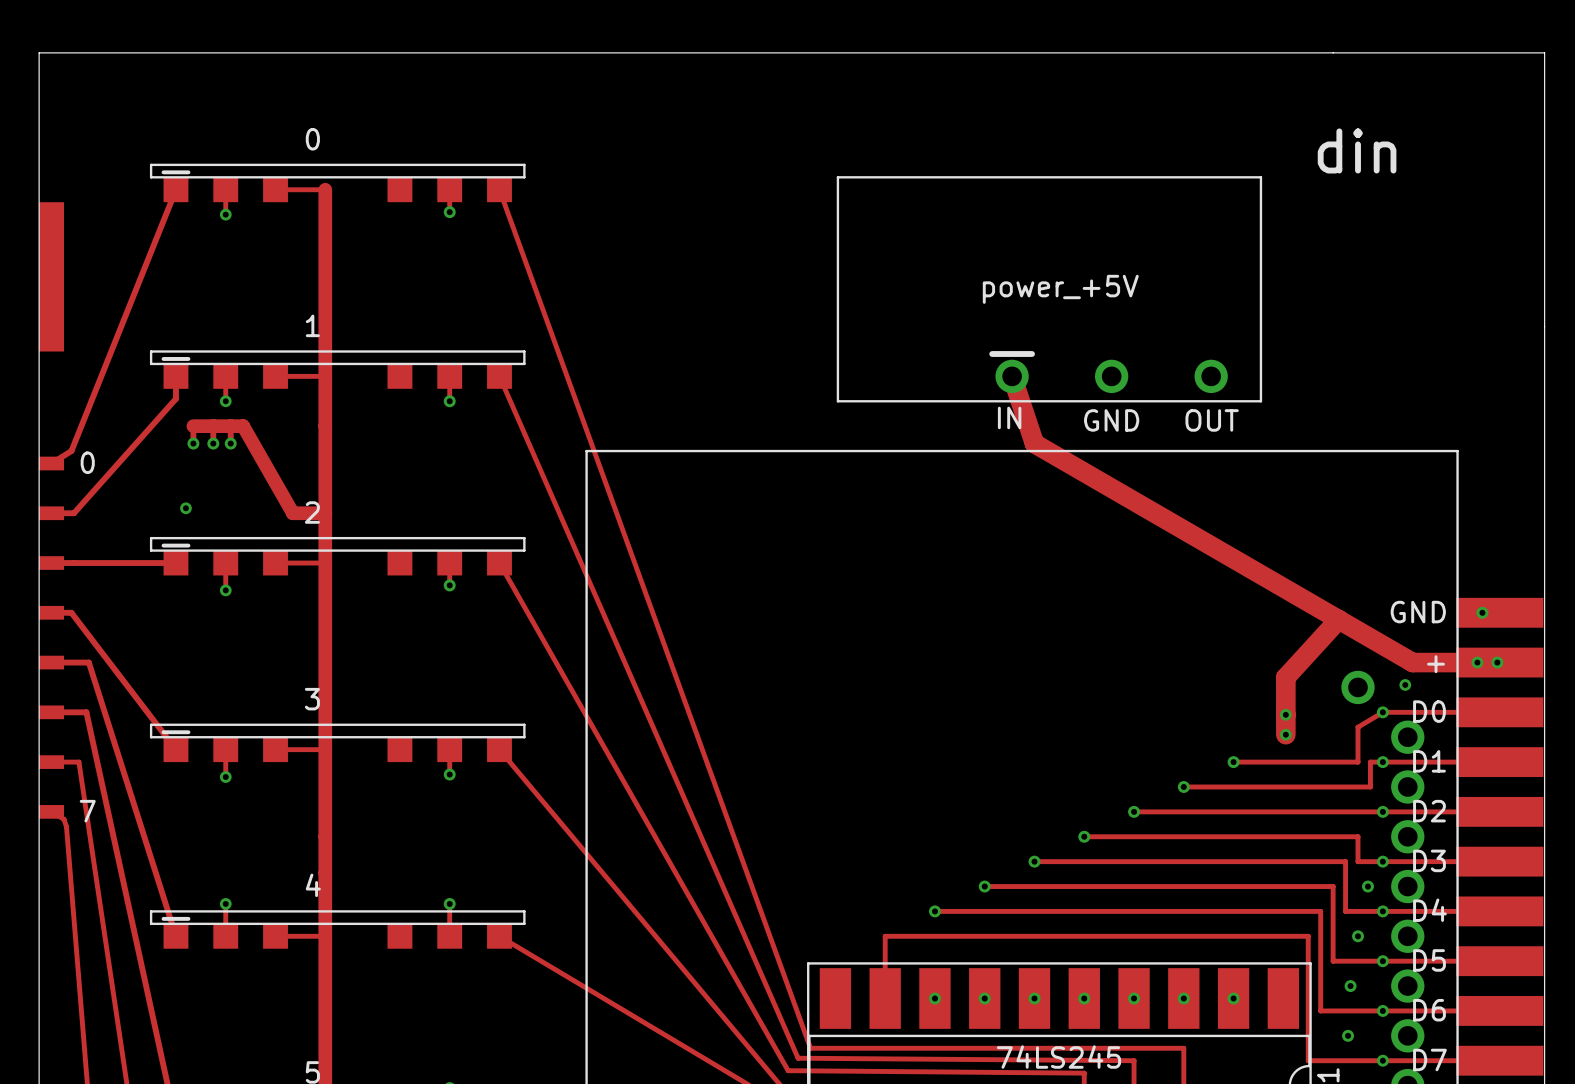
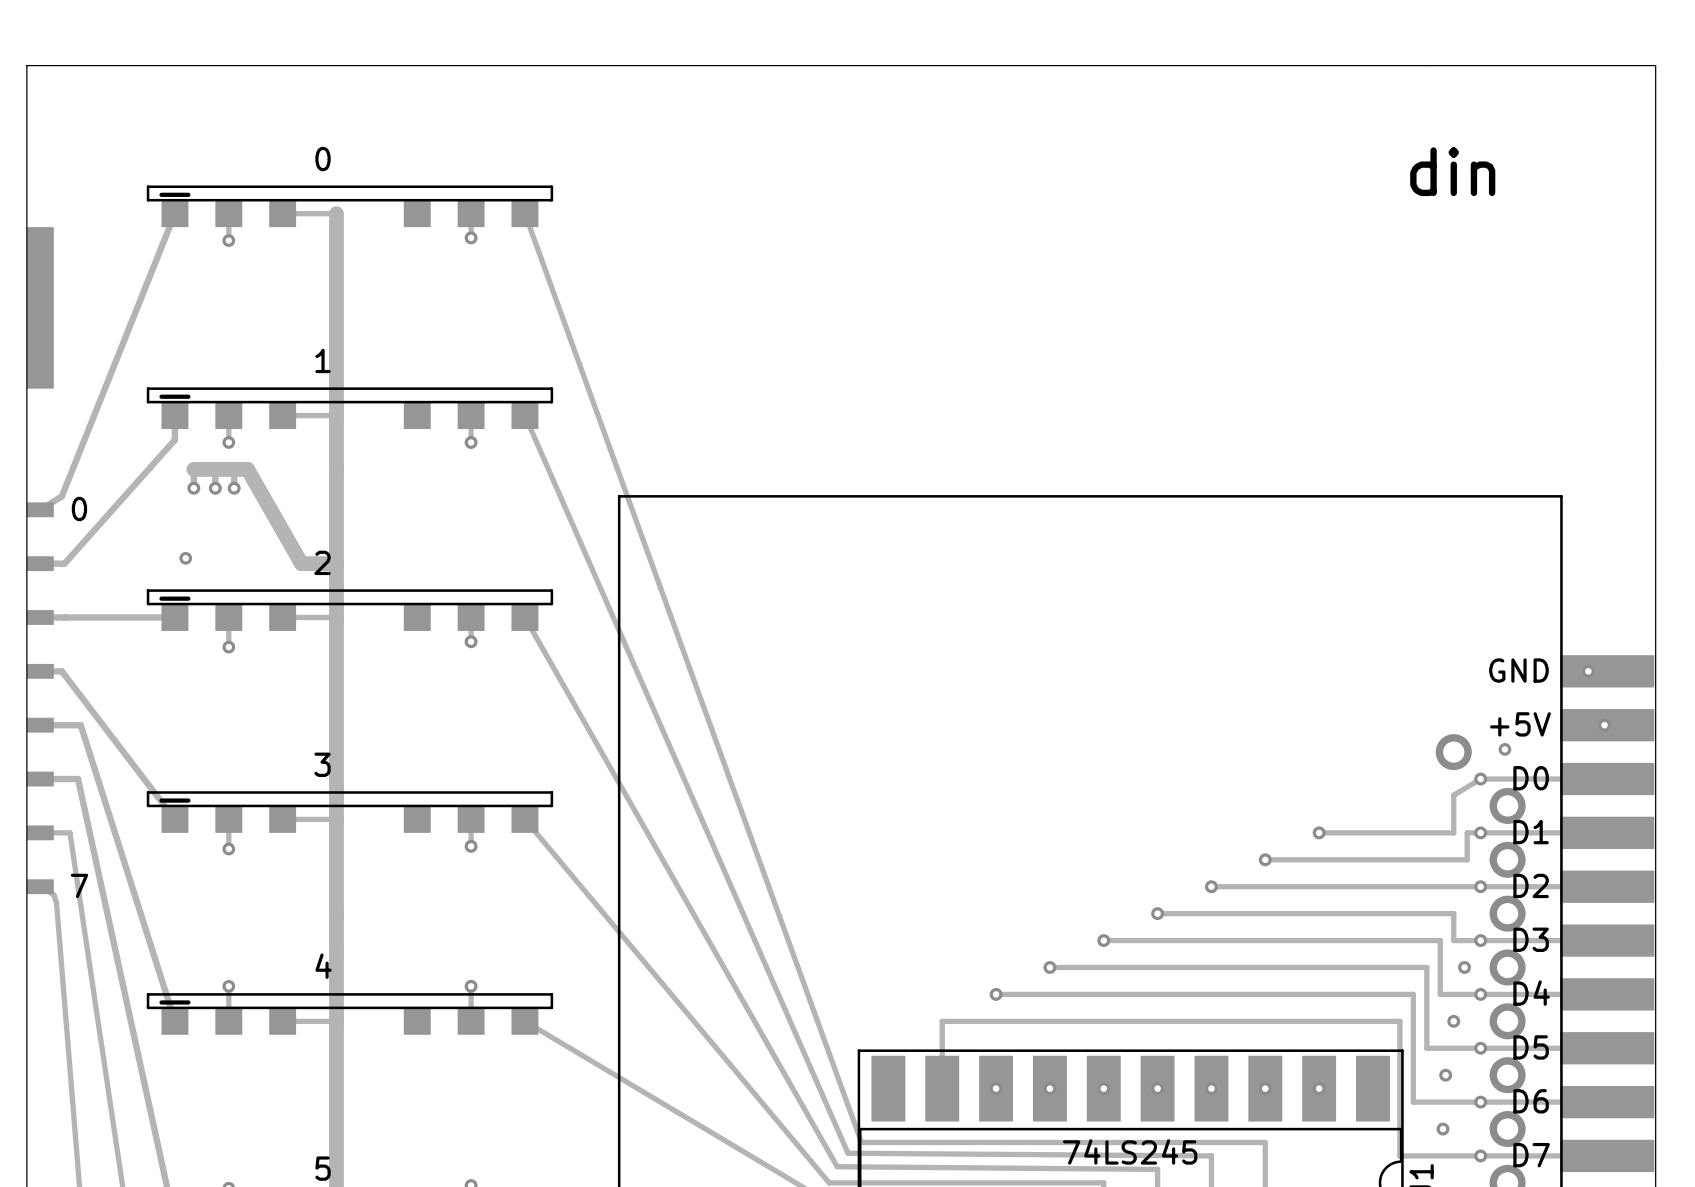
part: power_+5V (1049, 289) -> none
track: (1012, 376) (1034, 443) (1412, 662) (1497, 662) -> none
track: (1338, 619) (1285, 677) (1285, 734) -> none
via: (1477, 662) -> none
part text: + (1436, 664) -> +5V (1520, 724)
via: (1285, 714) -> none
via: (1285, 734) -> none

